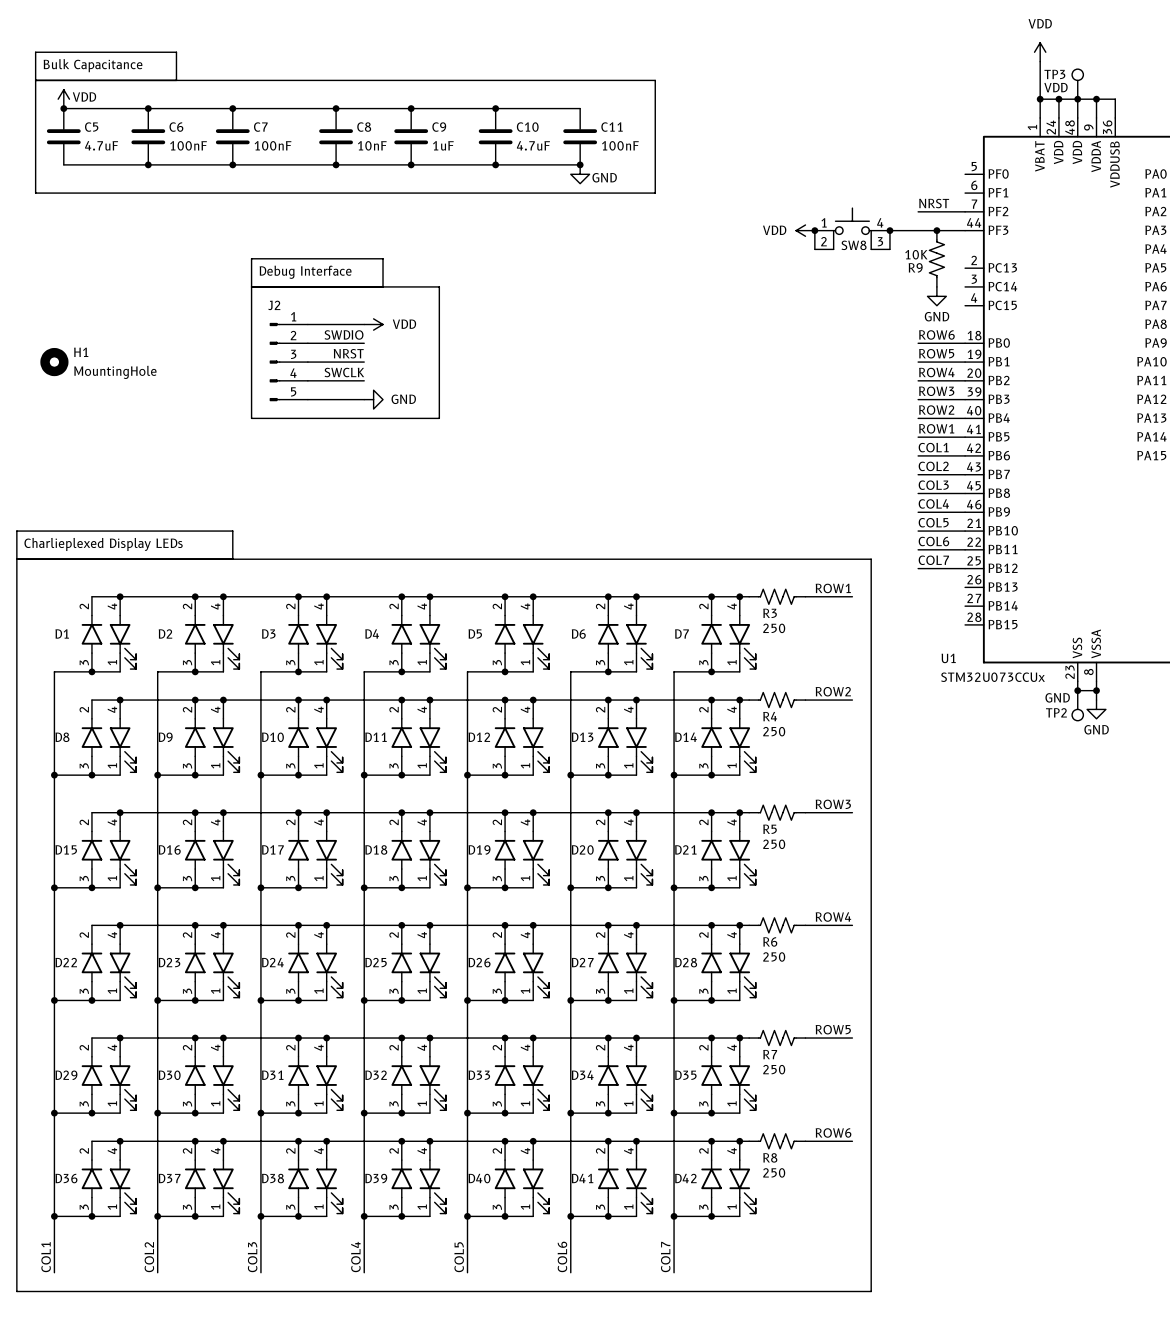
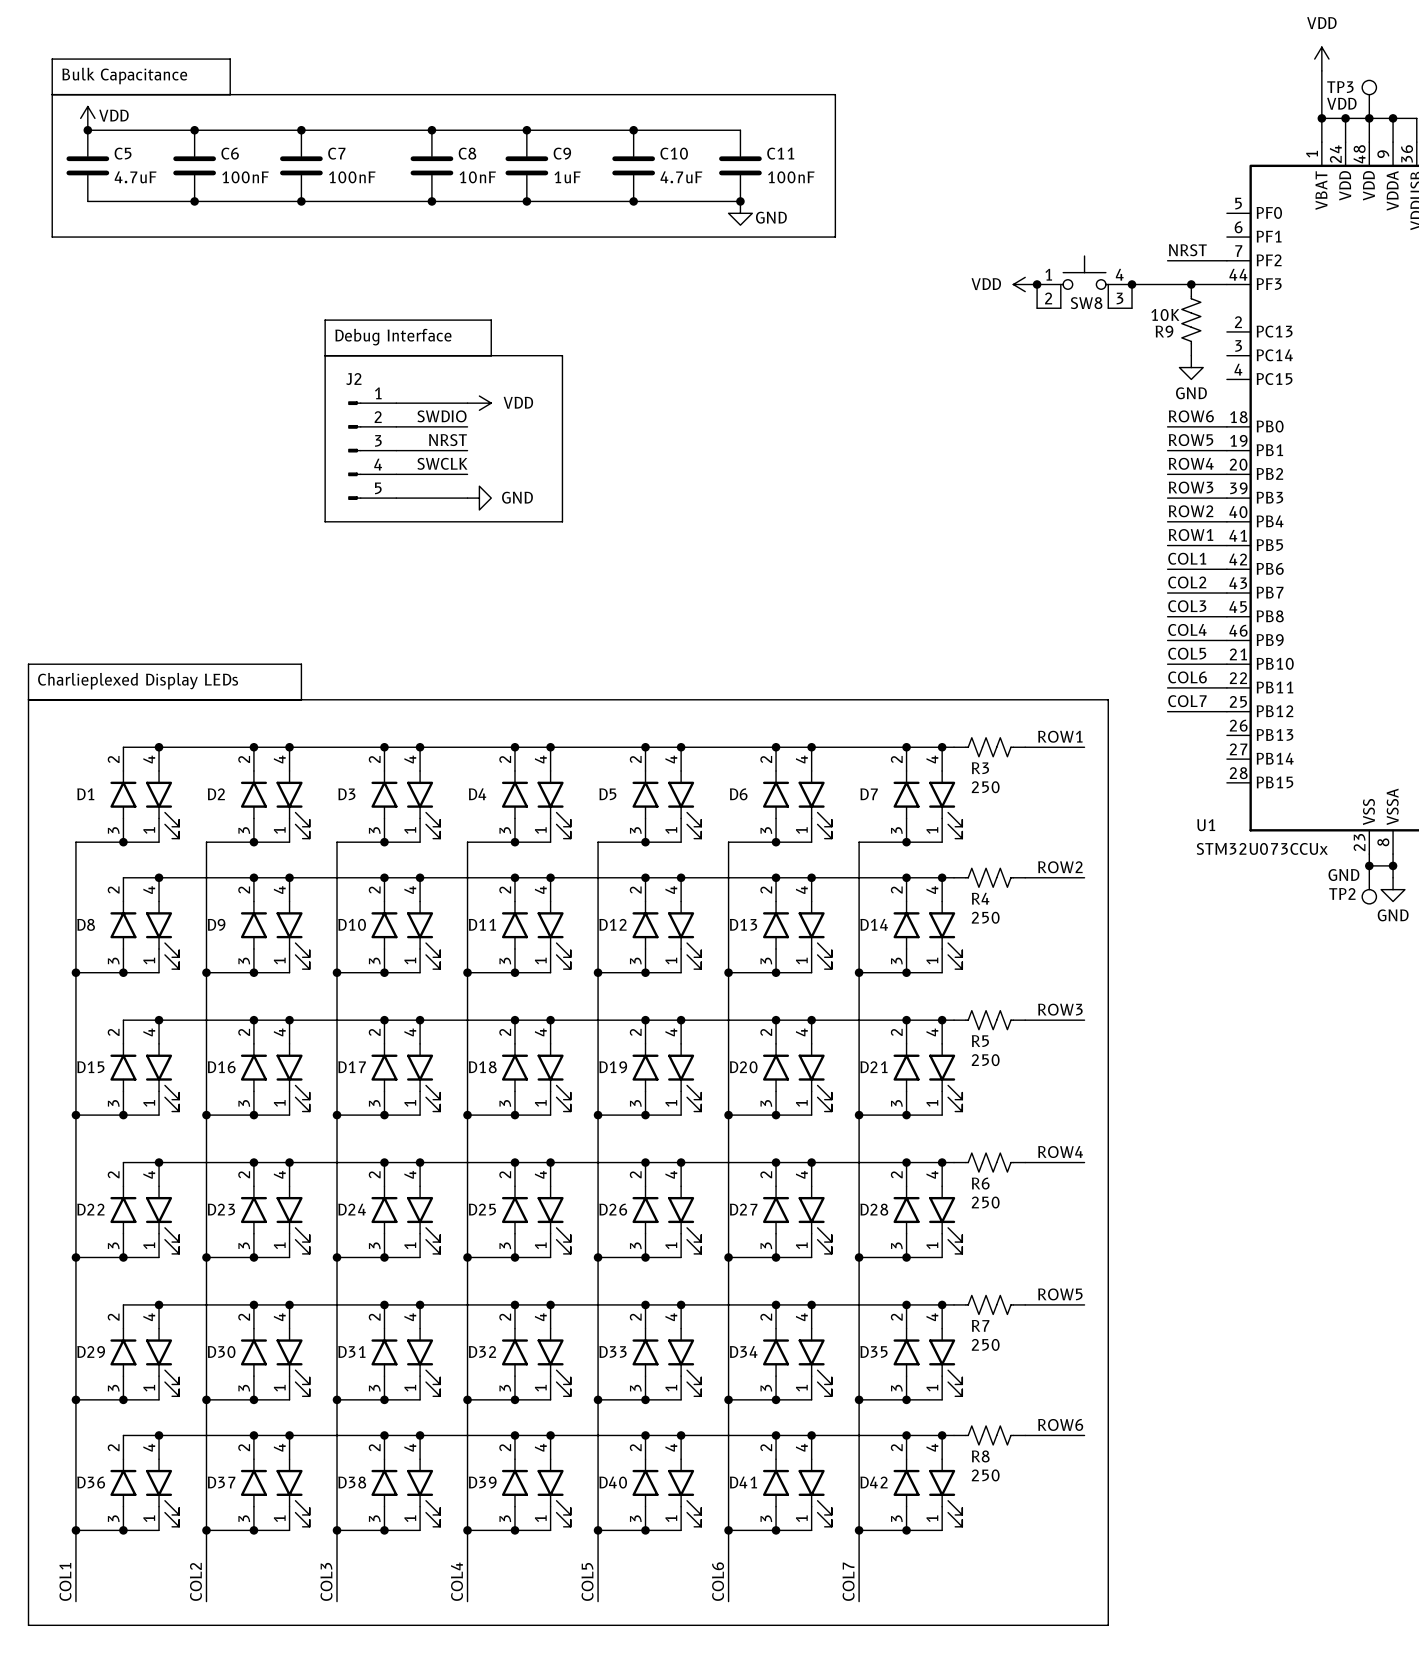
H1: MountingHole (54, 362) -> none

